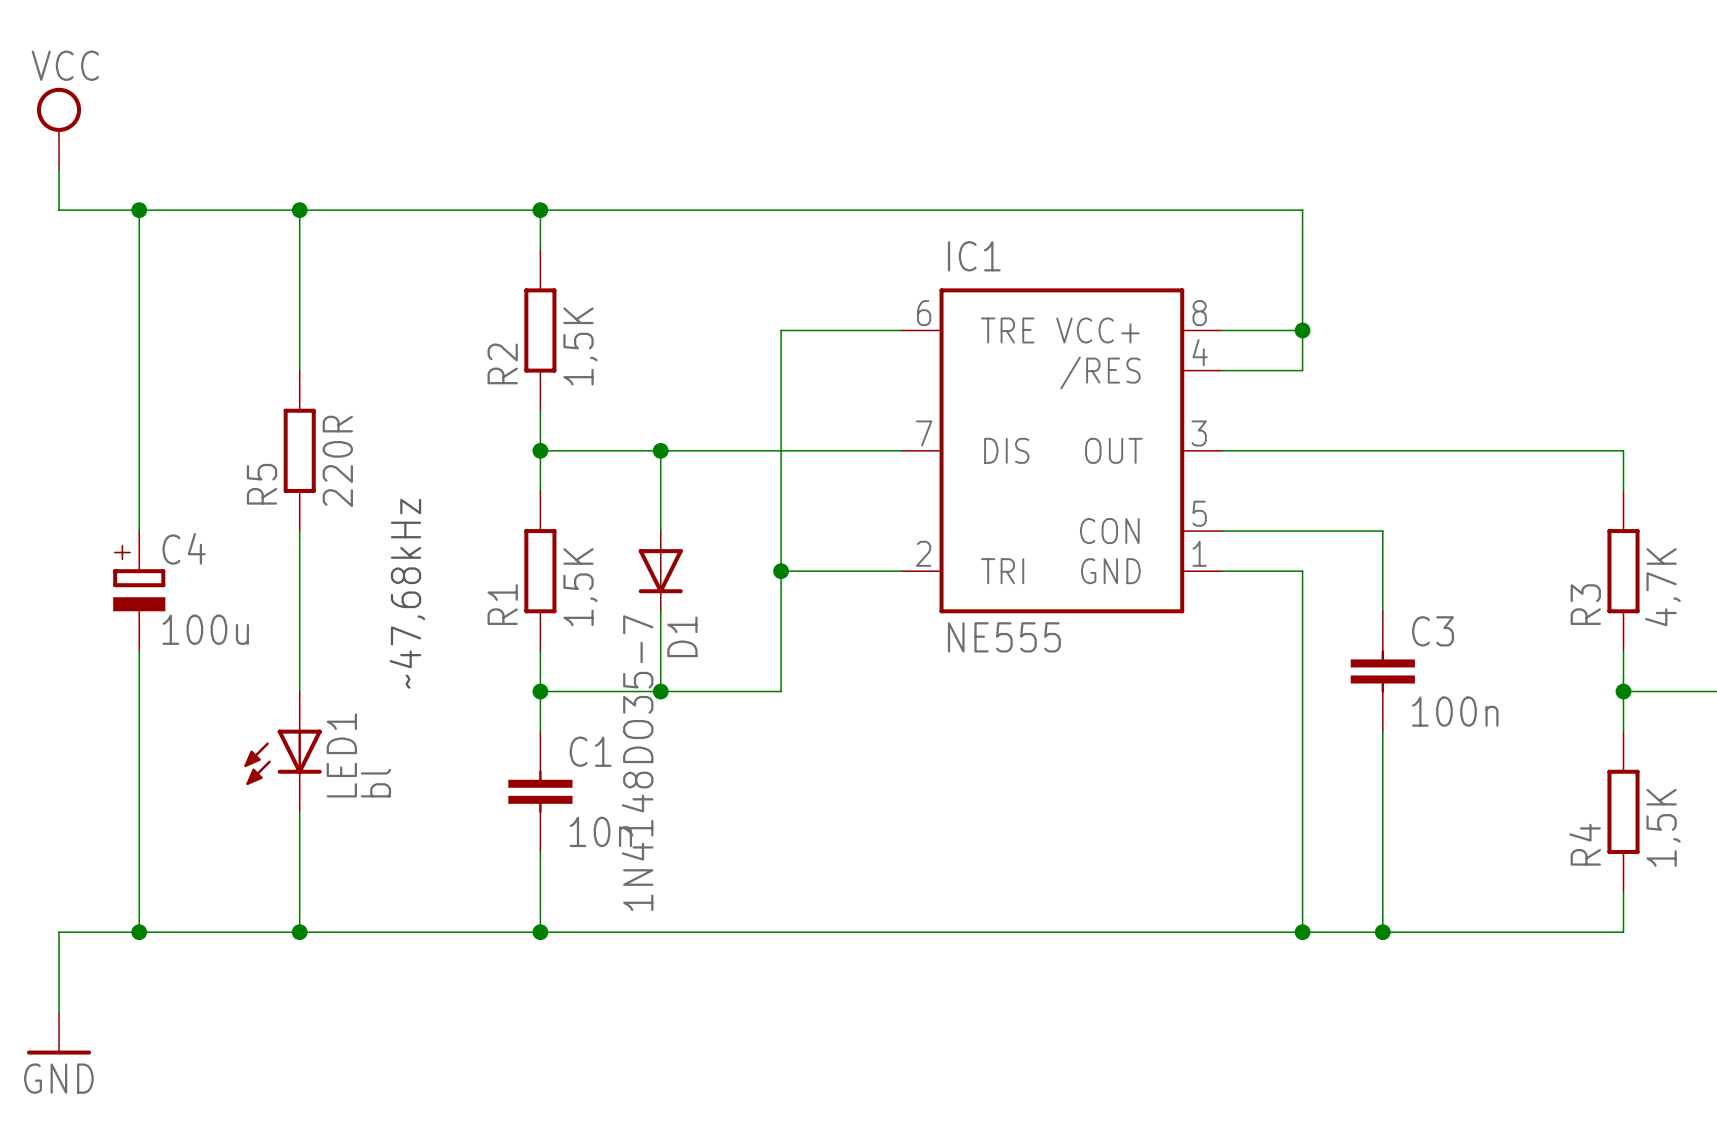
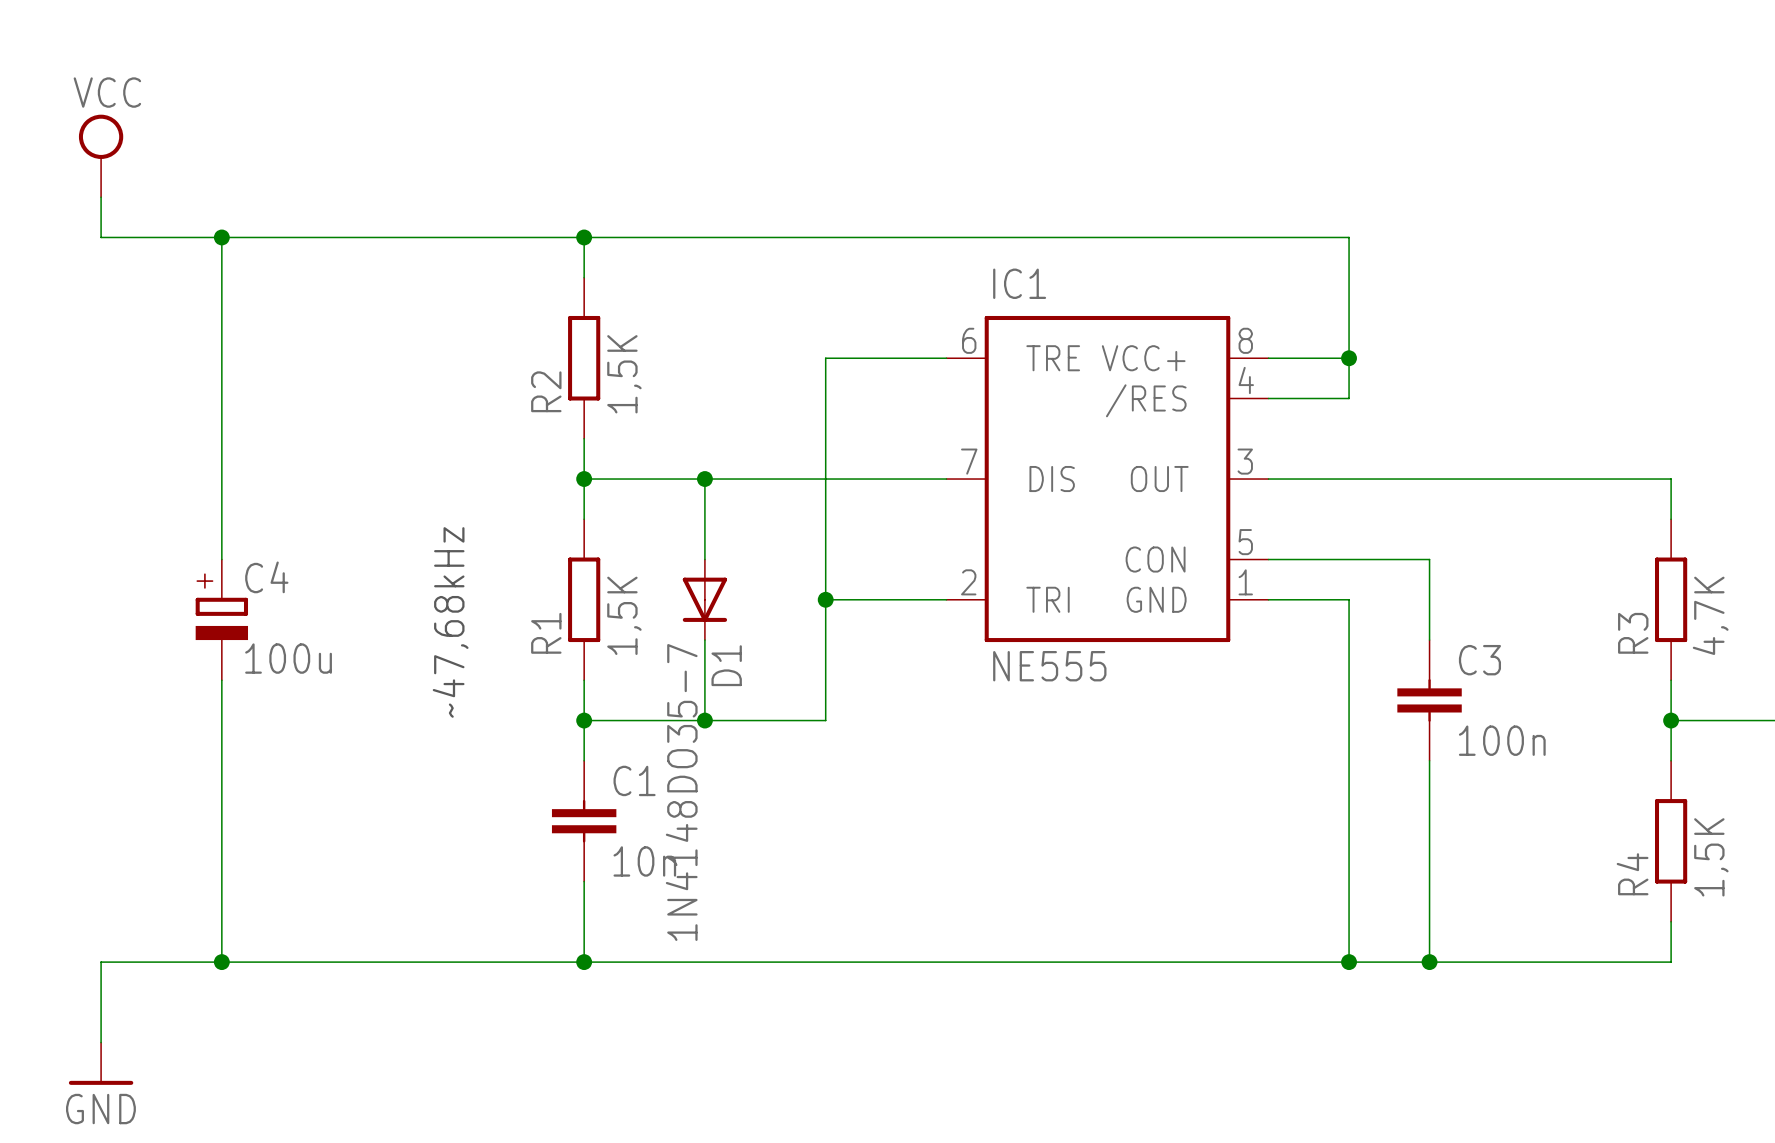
wire: (139, 210) (139, 531) -> (221, 237) (221, 559)
junction position: (139, 210) -> (221, 237)
wire: (299, 210) (299, 370) -> none
junction: (299, 210) -> none
R5: 220R (299, 450) -> none
wire: (299, 531) (299, 691) -> none
C4 position: (139, 591) -> (221, 619)
wire: (139, 651) (139, 932) -> (221, 680) (221, 962)
LED1: bl (283, 751) -> none
wire: (299, 811) (299, 932) -> none
junction position: (139, 932) -> (221, 962)
junction: (299, 932) -> none

